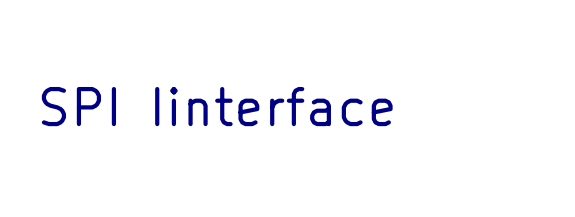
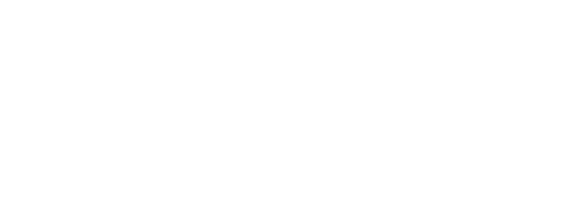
text: SPI Iinterface (217, 106) -> none

